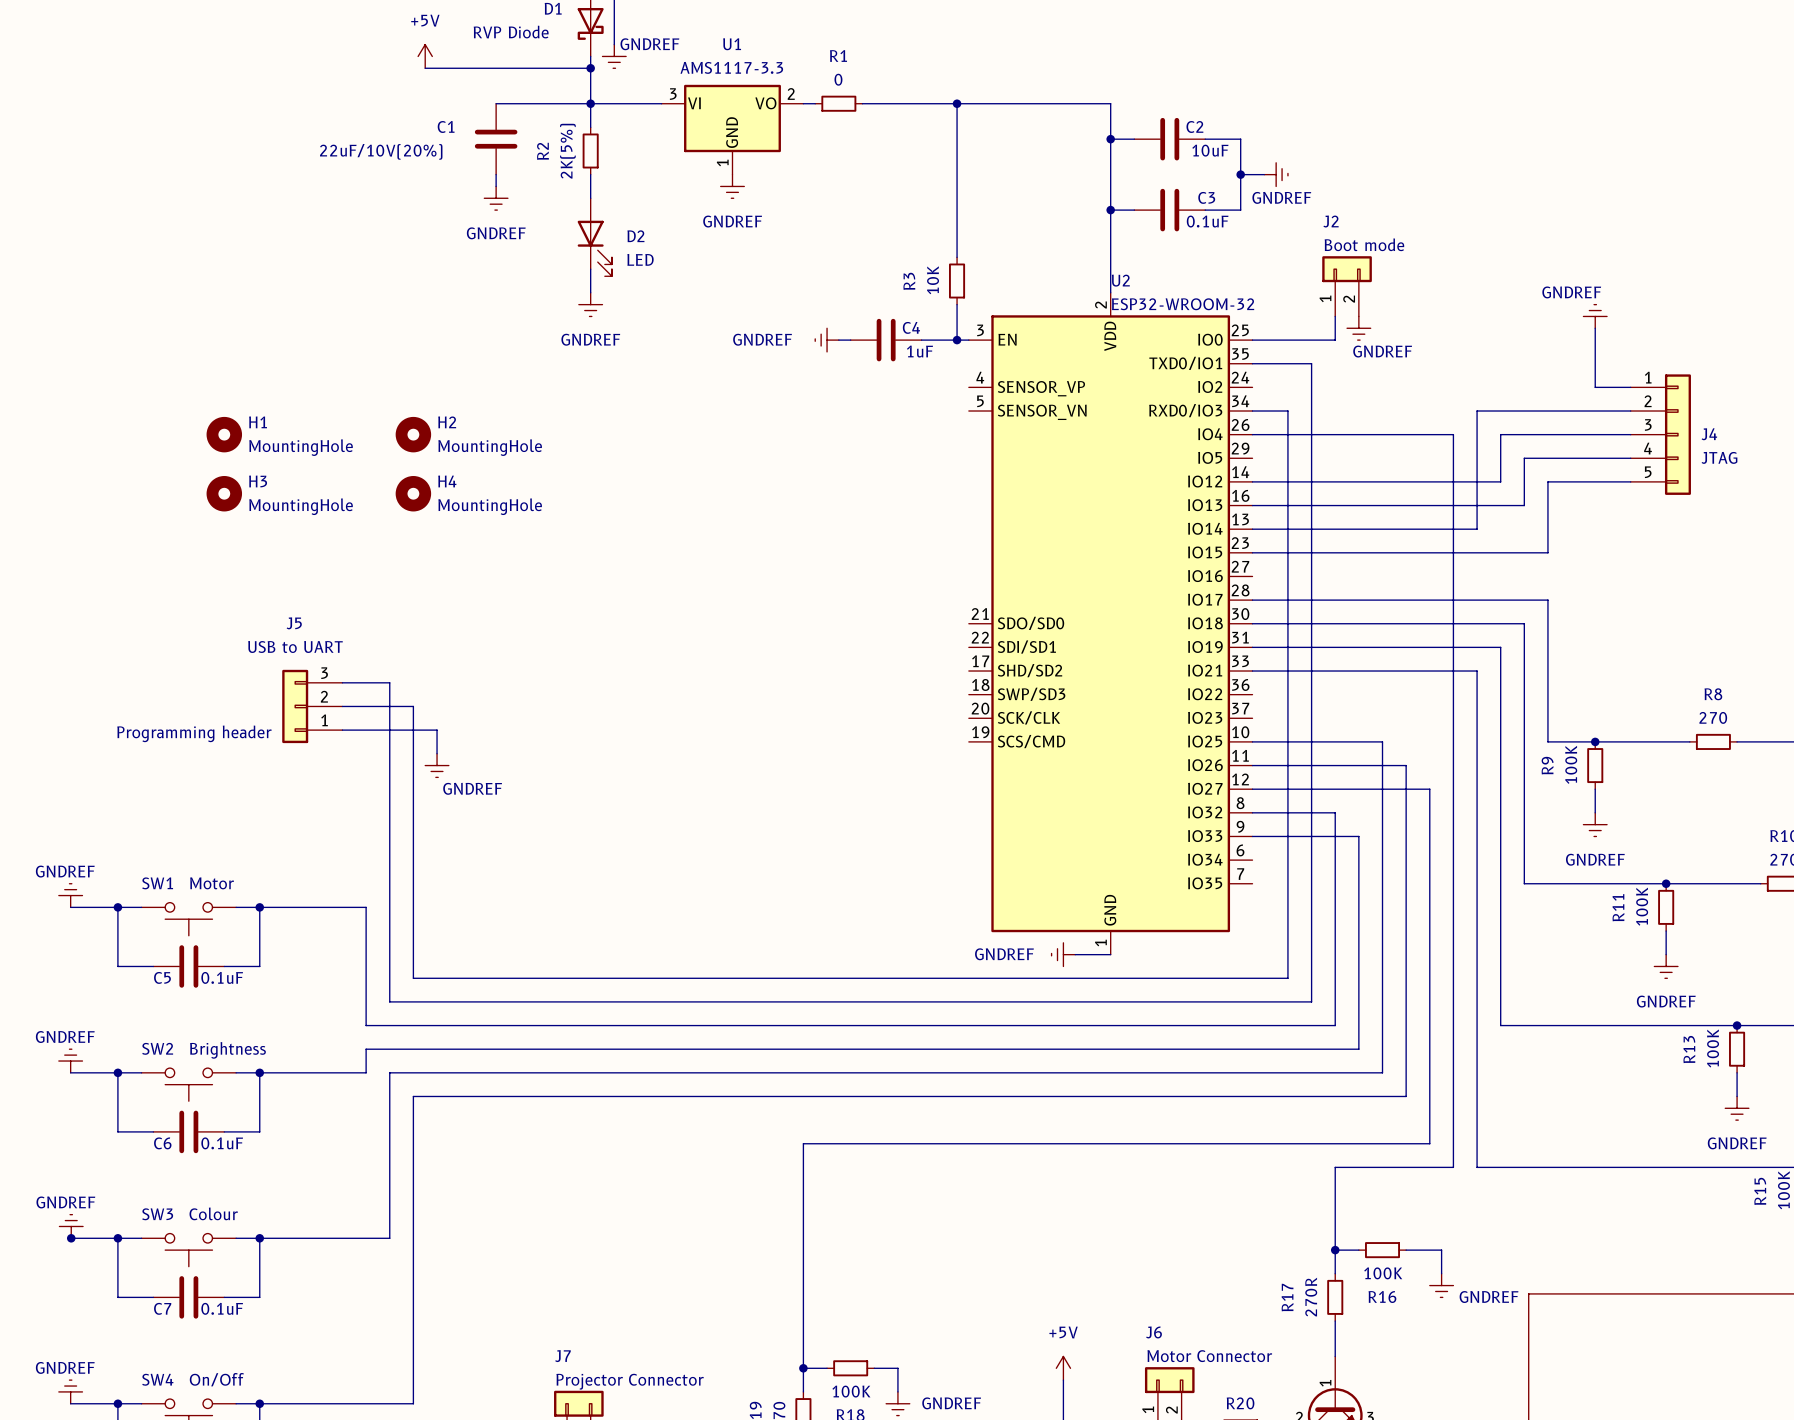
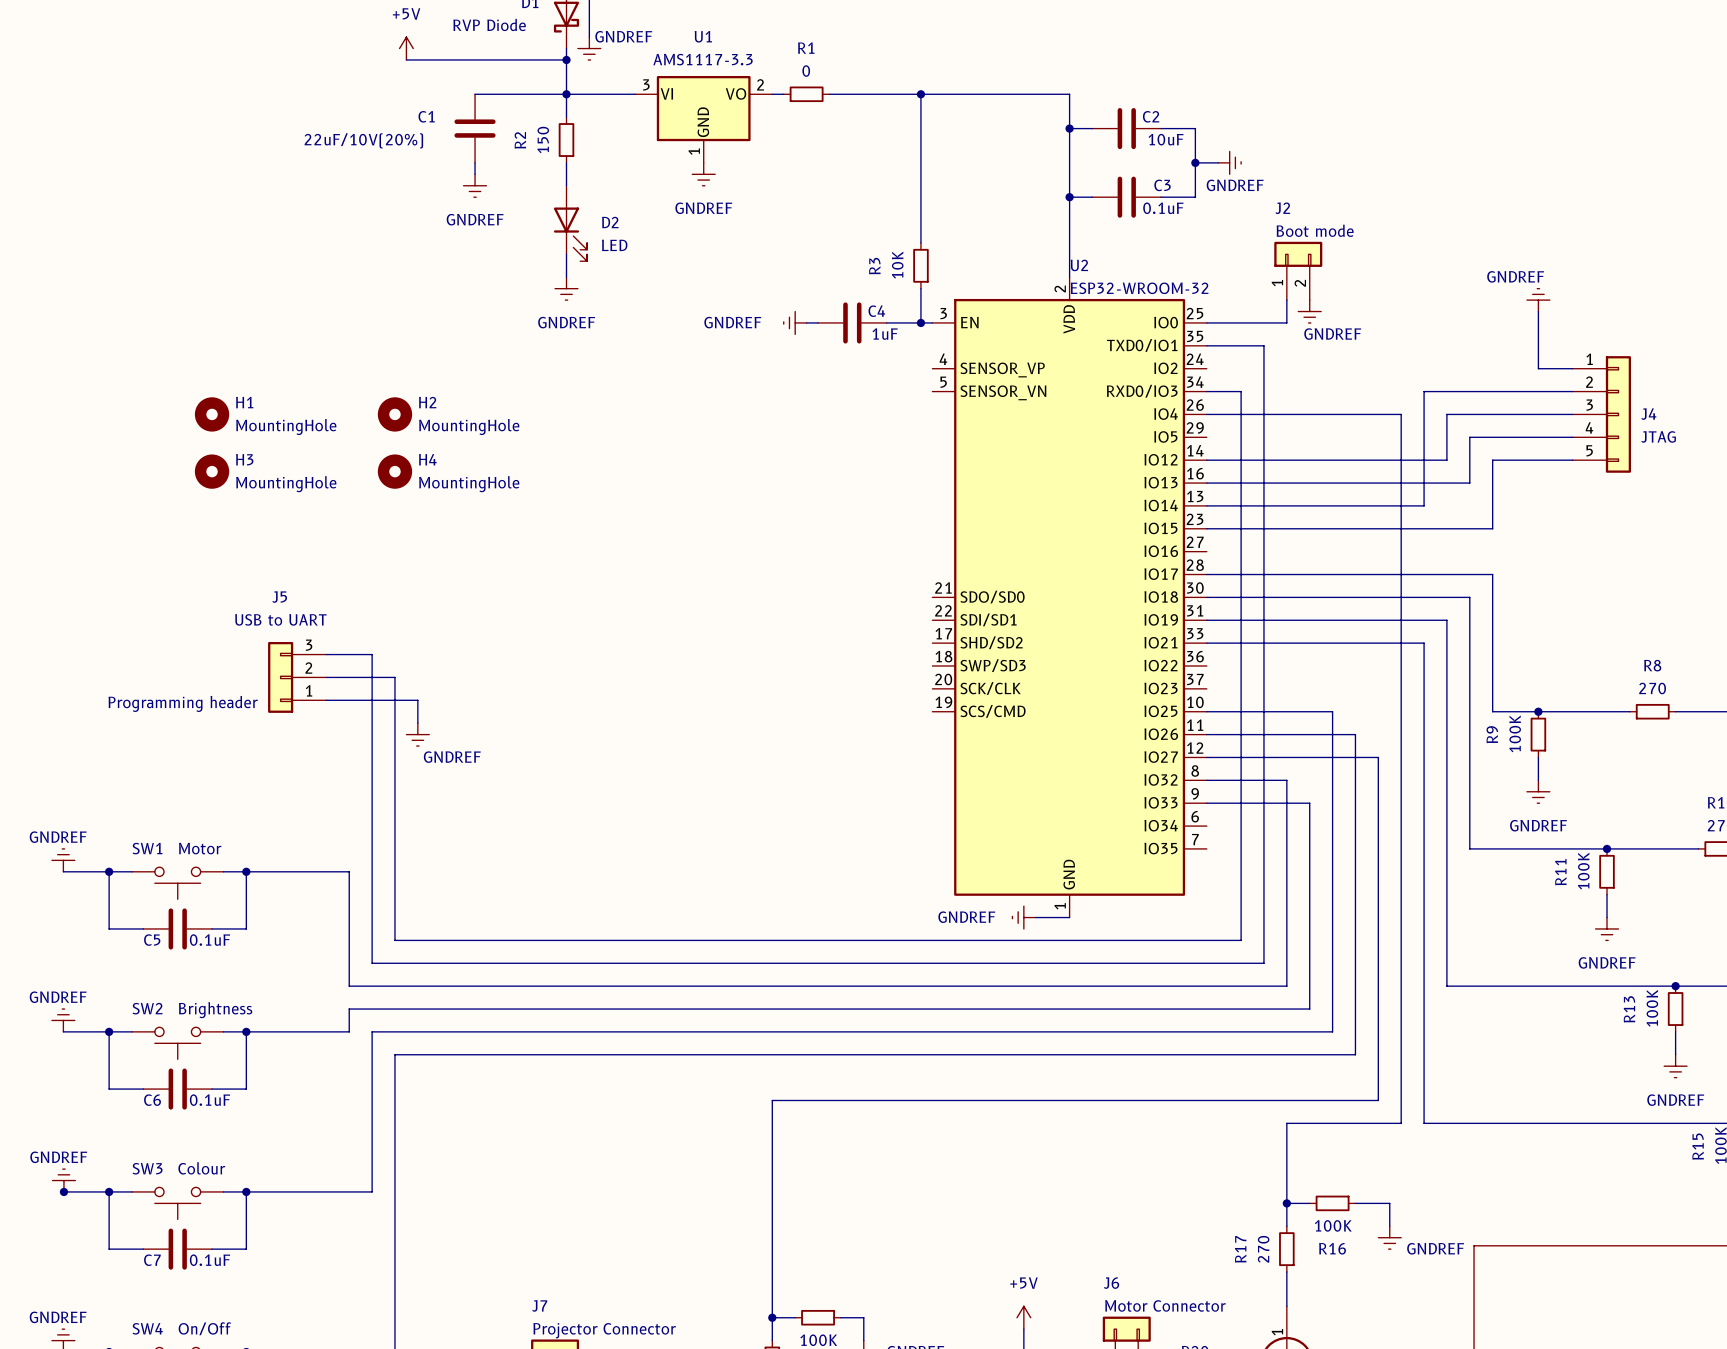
R2 value: 2K(5%) (567, 151) -> 150 (543, 139)
R17 value: 270R (1311, 1297) -> 270 (1263, 1249)

